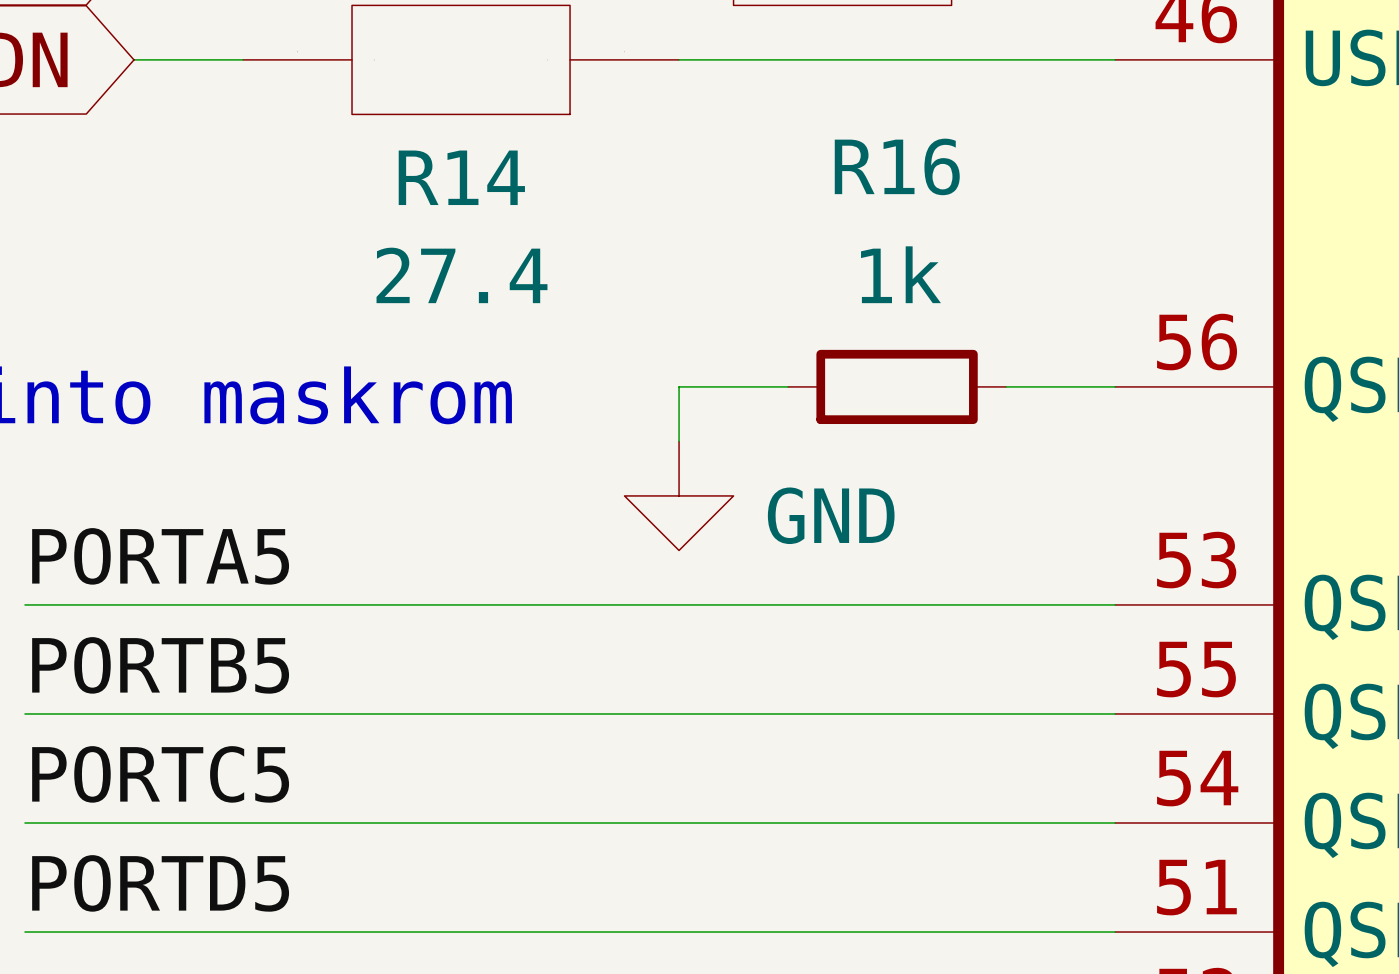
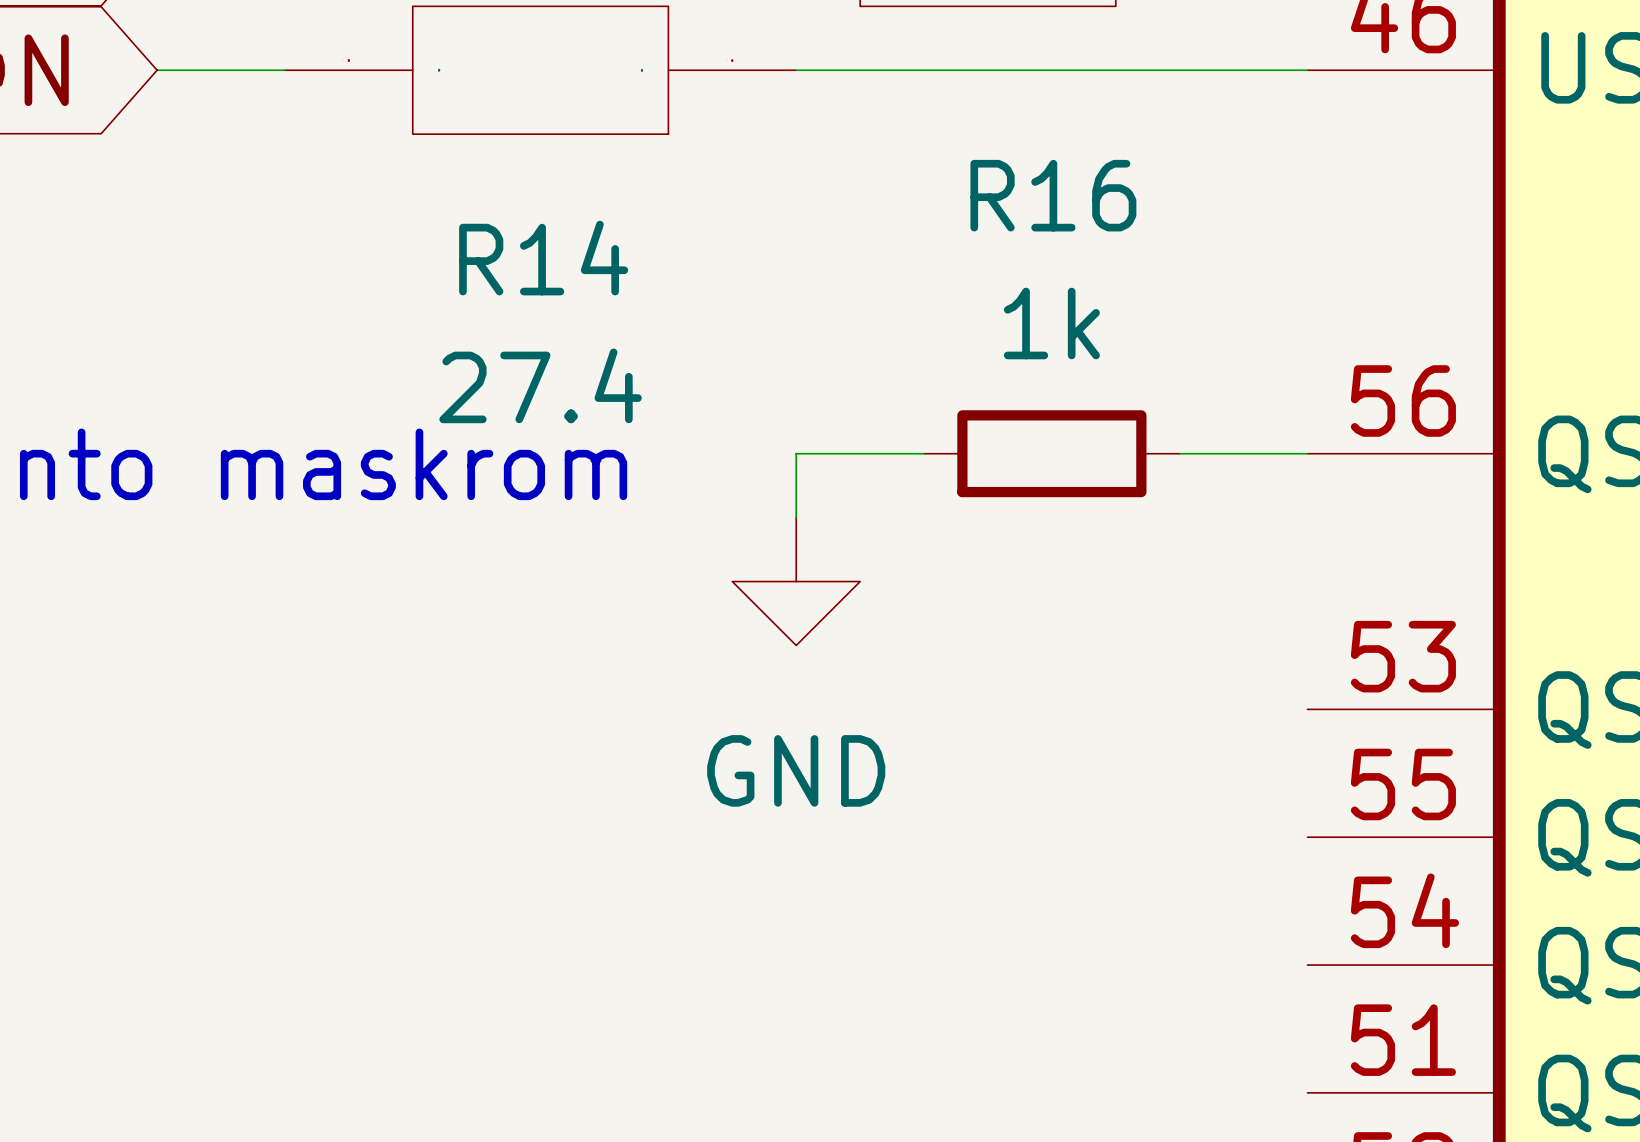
R14 name position: R14 (461, 177) -> R14 (543, 258)
R14 value position: 27.4 (462, 275) -> 27.4 (540, 385)
power symbol text position: GND (831, 515) -> GND (796, 770)
label: PORTA5 (160, 556) -> none
wire: (24, 604) (1115, 604) -> none
label: PORTB5 (160, 665) -> none
wire: (24, 713) (1115, 713) -> none
label: PORTC5 (160, 774) -> none
wire: (24, 823) (1115, 823) -> none
label: PORTD5 (160, 883) -> none
wire: (24, 932) (1115, 932) -> none

